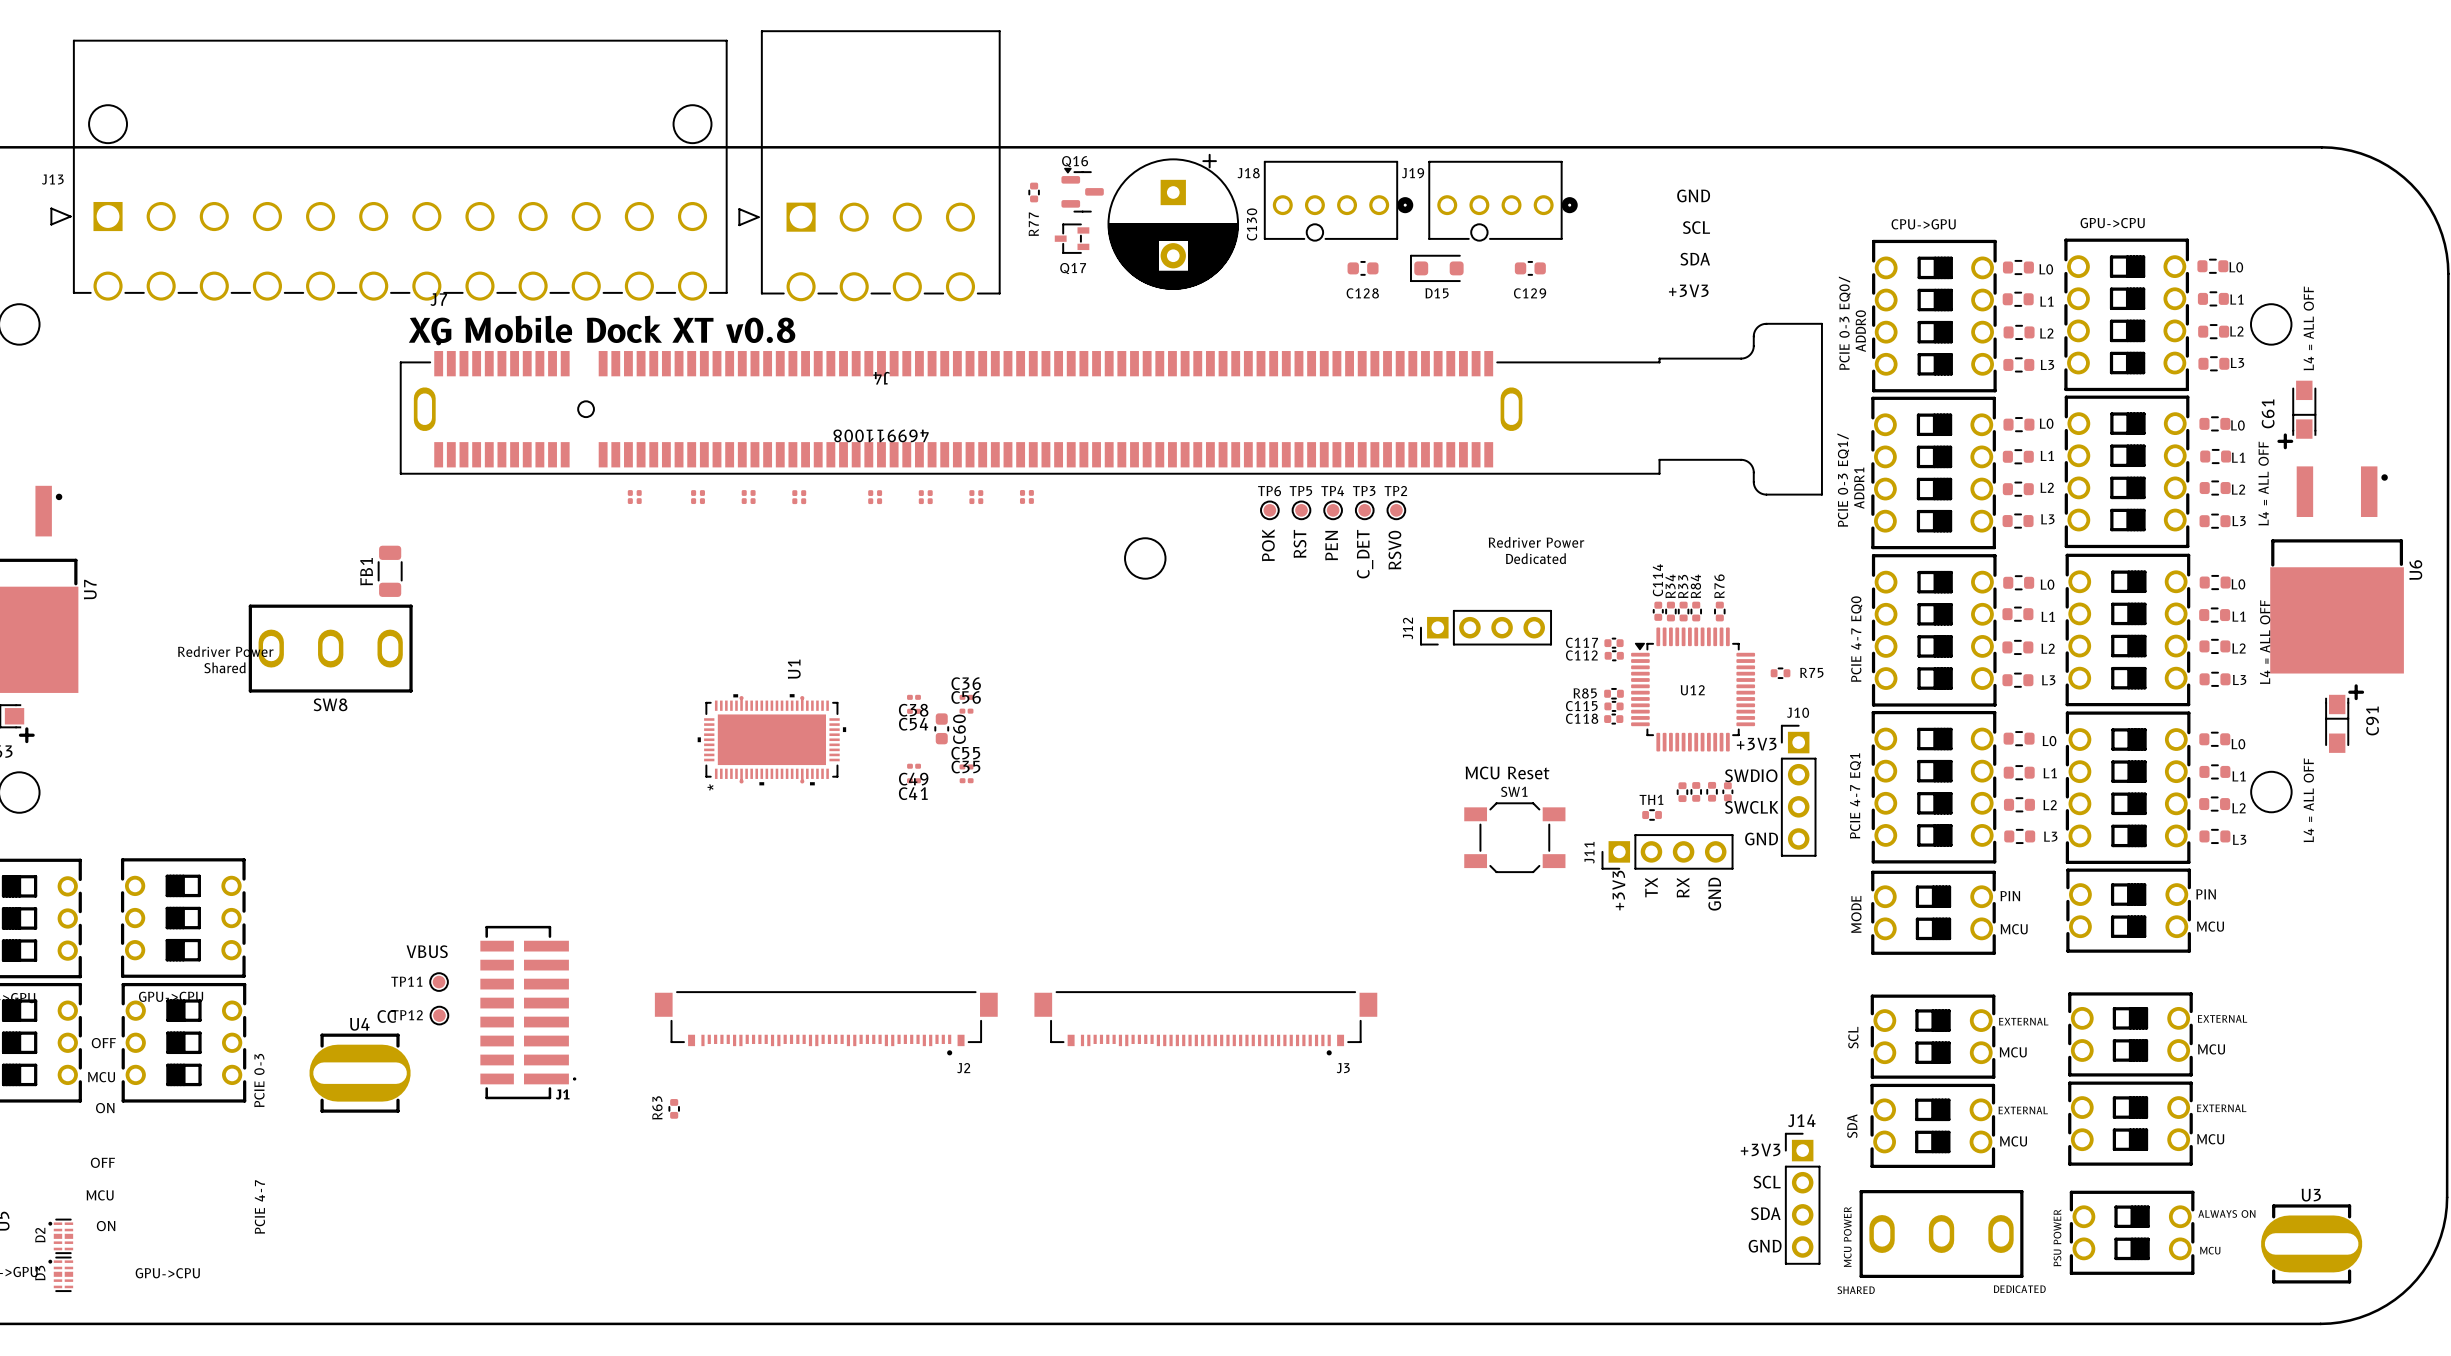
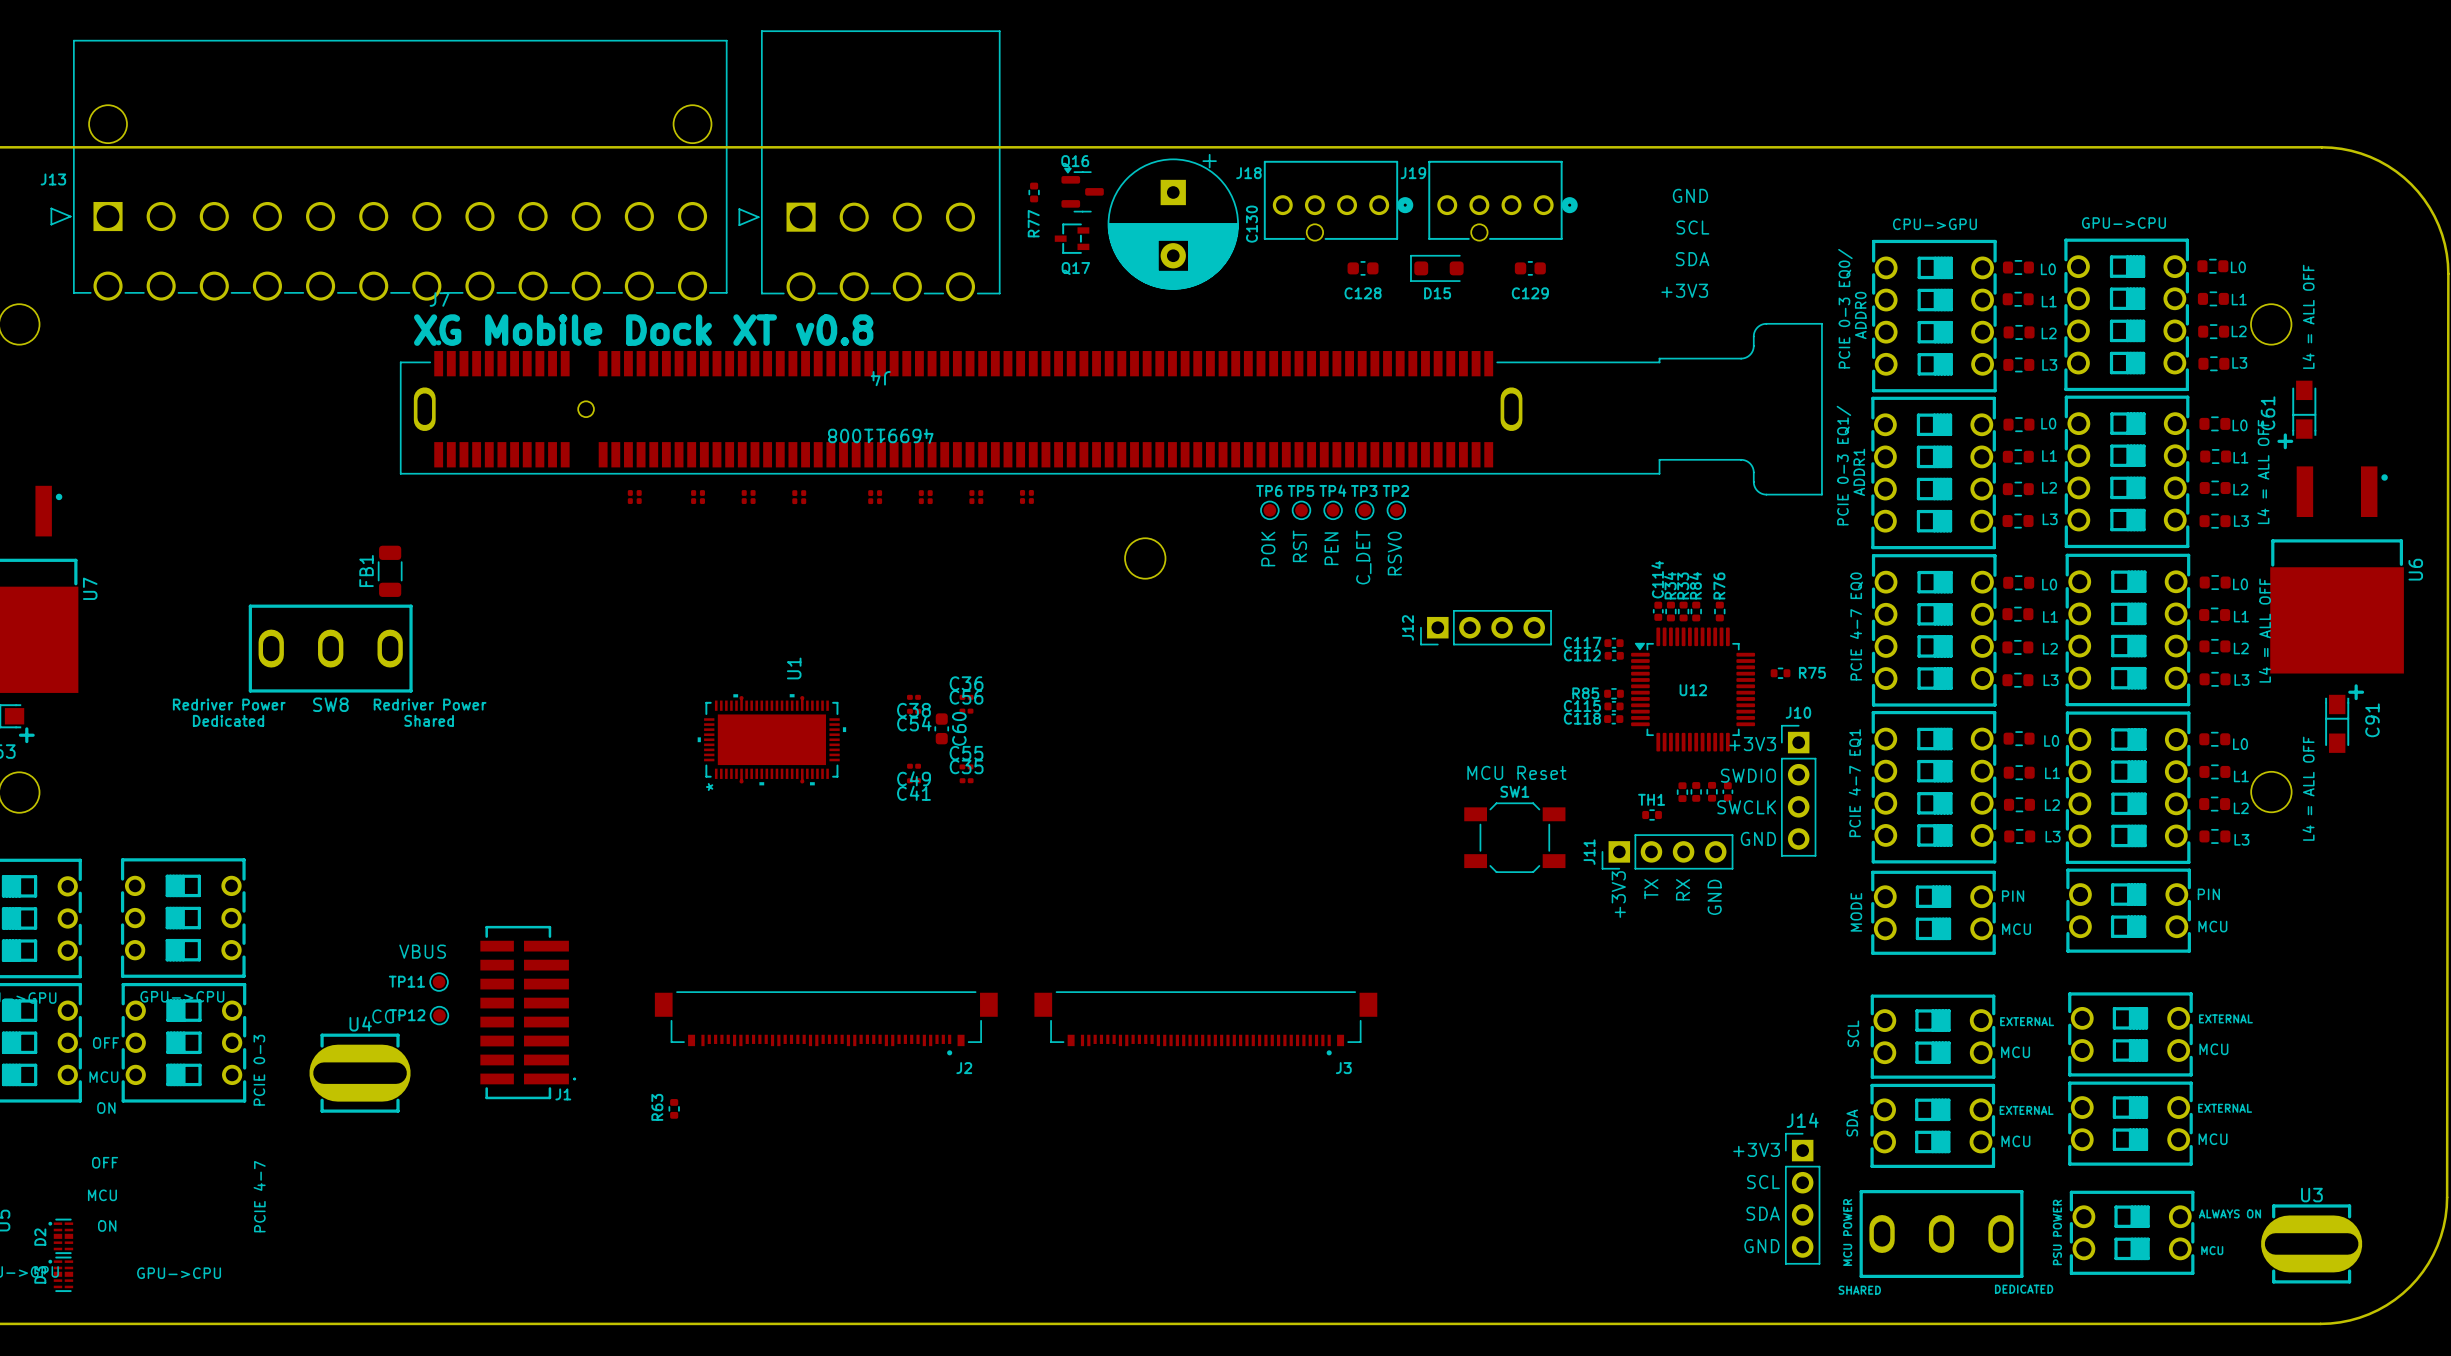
text: Redriver Power (1536, 542) -> none
text: Dedicated (1535, 558) -> none
text position: Redriver Power (225, 651) -> Redriver Power (229, 704)
text position: Shared (224, 667) -> Shared (429, 720)
text: none -> Redriver Power (430, 704)
text: none -> Dedicated (228, 720)

